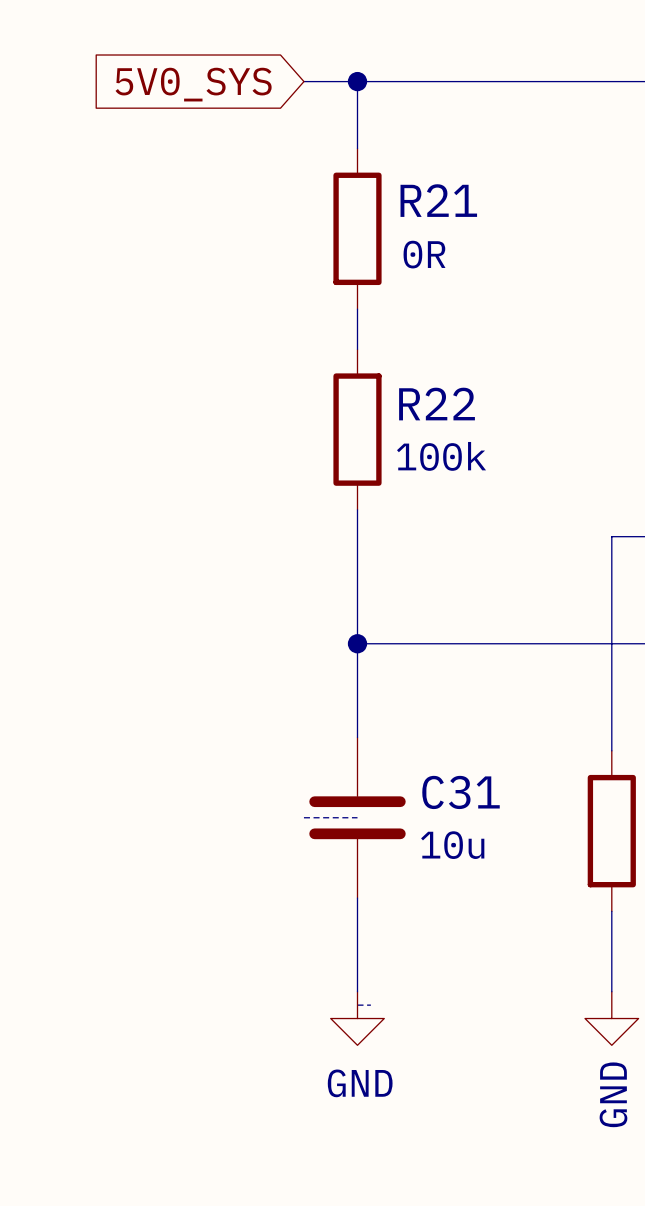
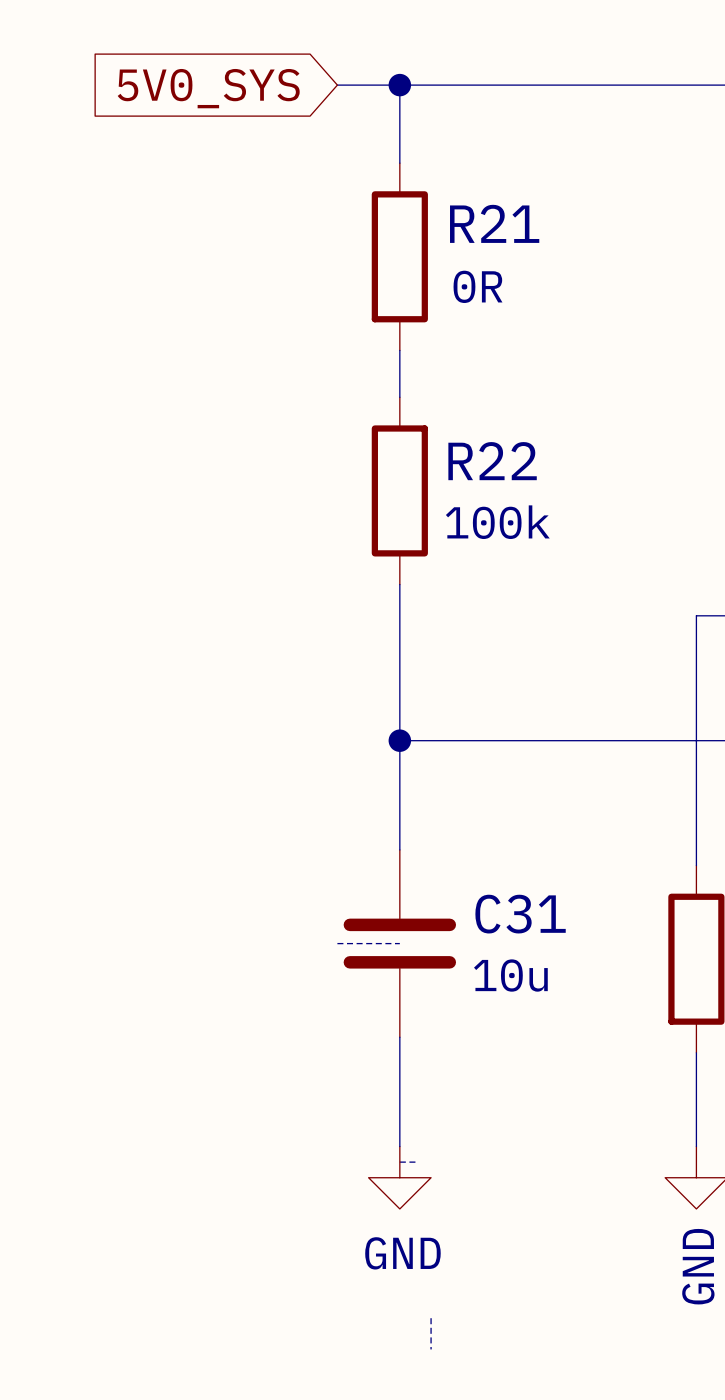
line: none -> (431, 1318) (431, 1349)

